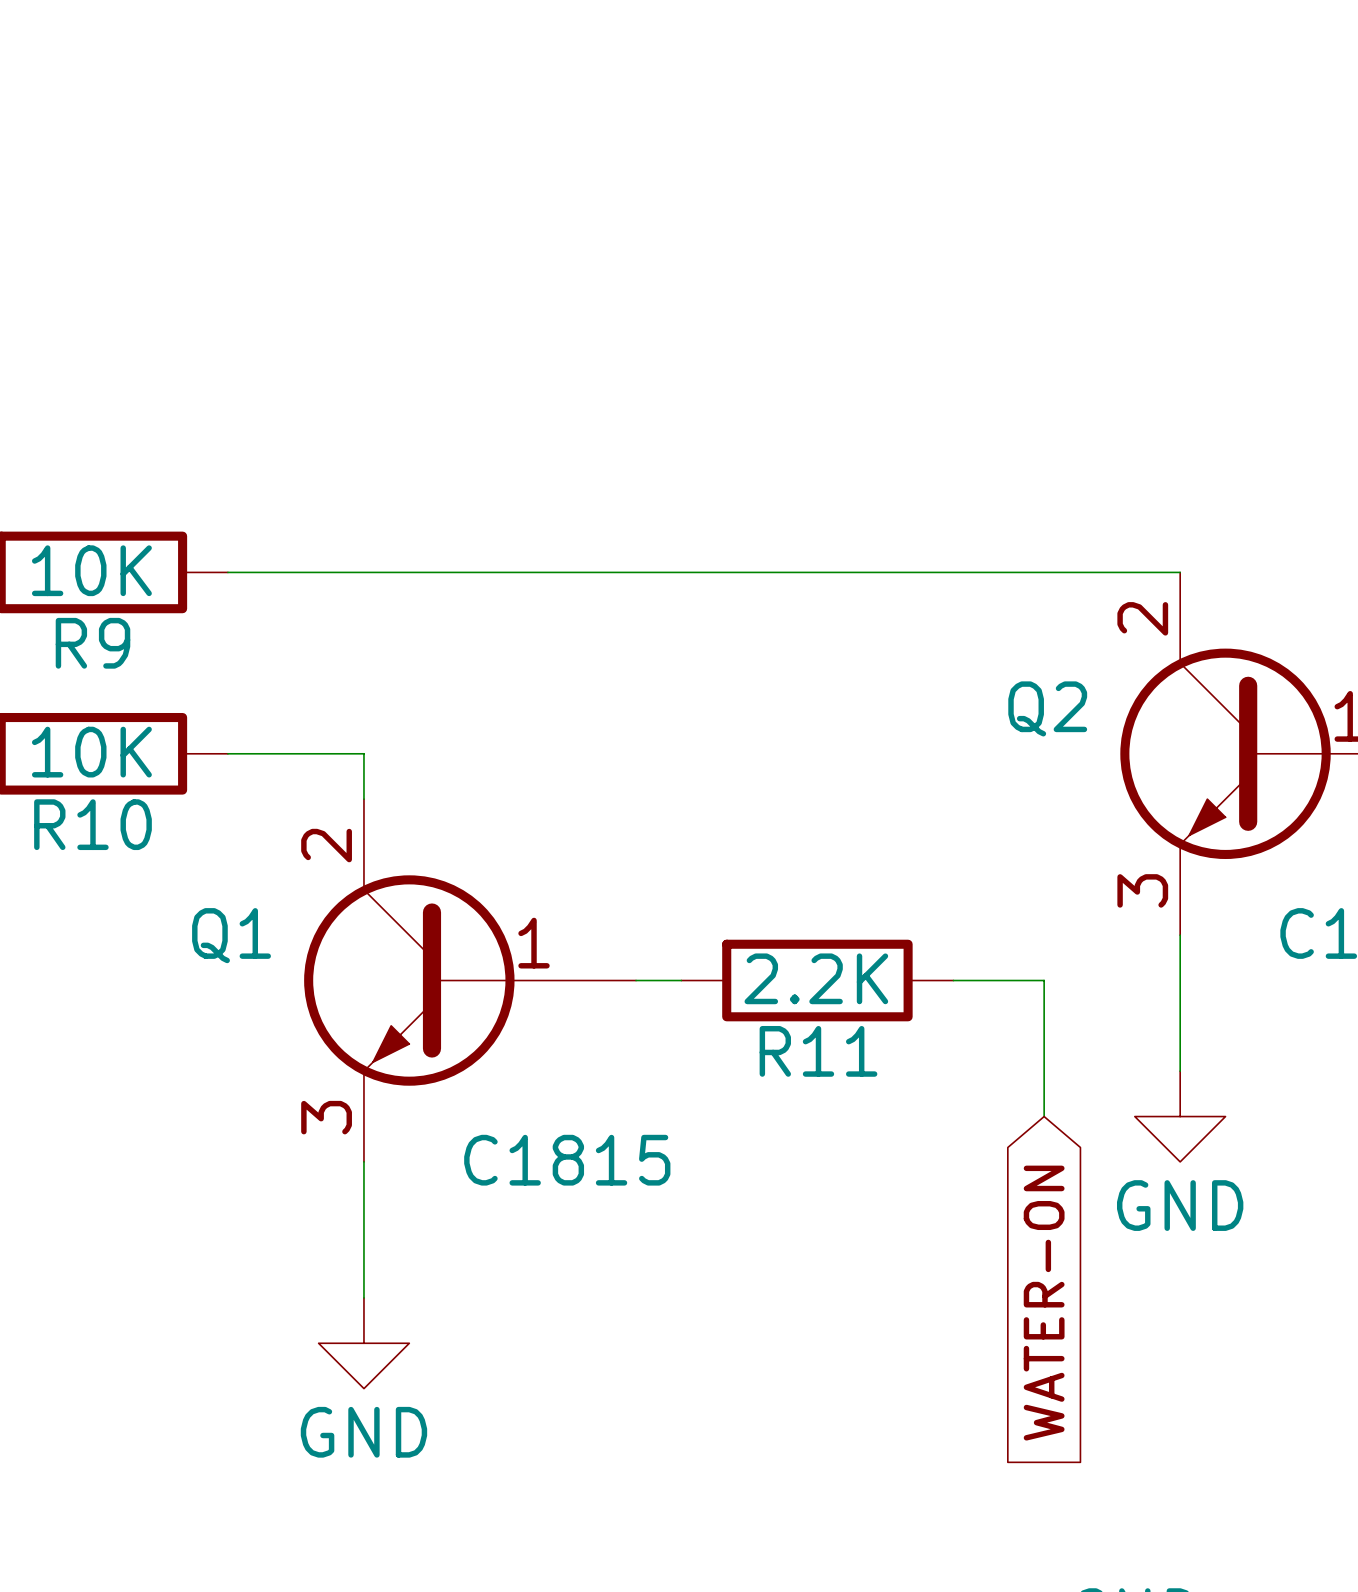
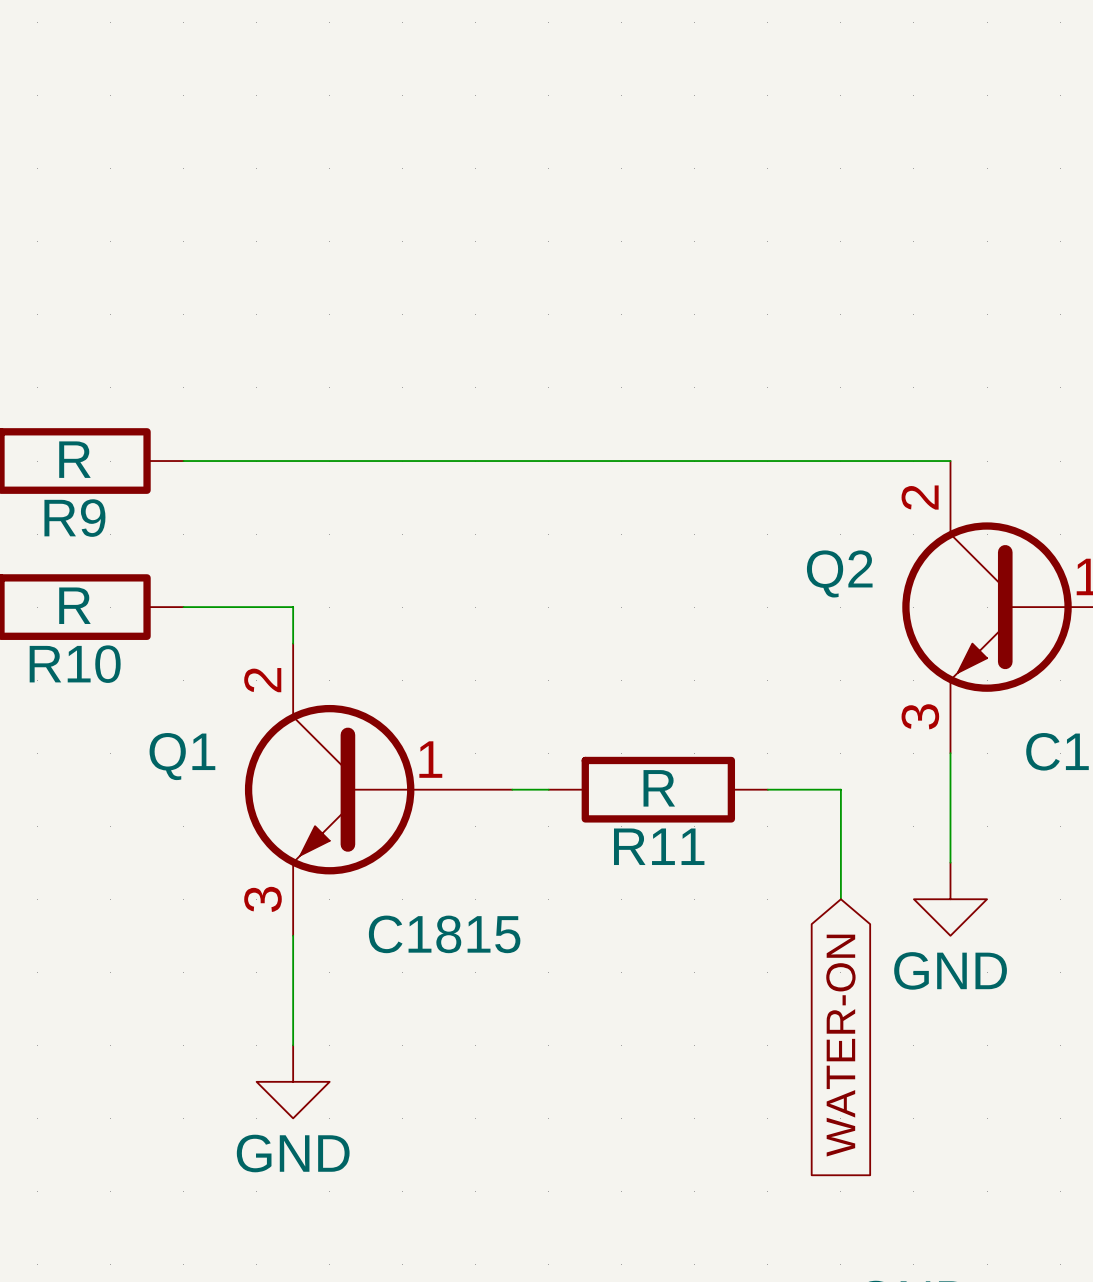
R9 value: 10K (91, 570) -> R (74, 459)
R10 value: 10K (91, 752) -> R (74, 605)
R11 value: 2.2K (816, 978) -> R (659, 788)

